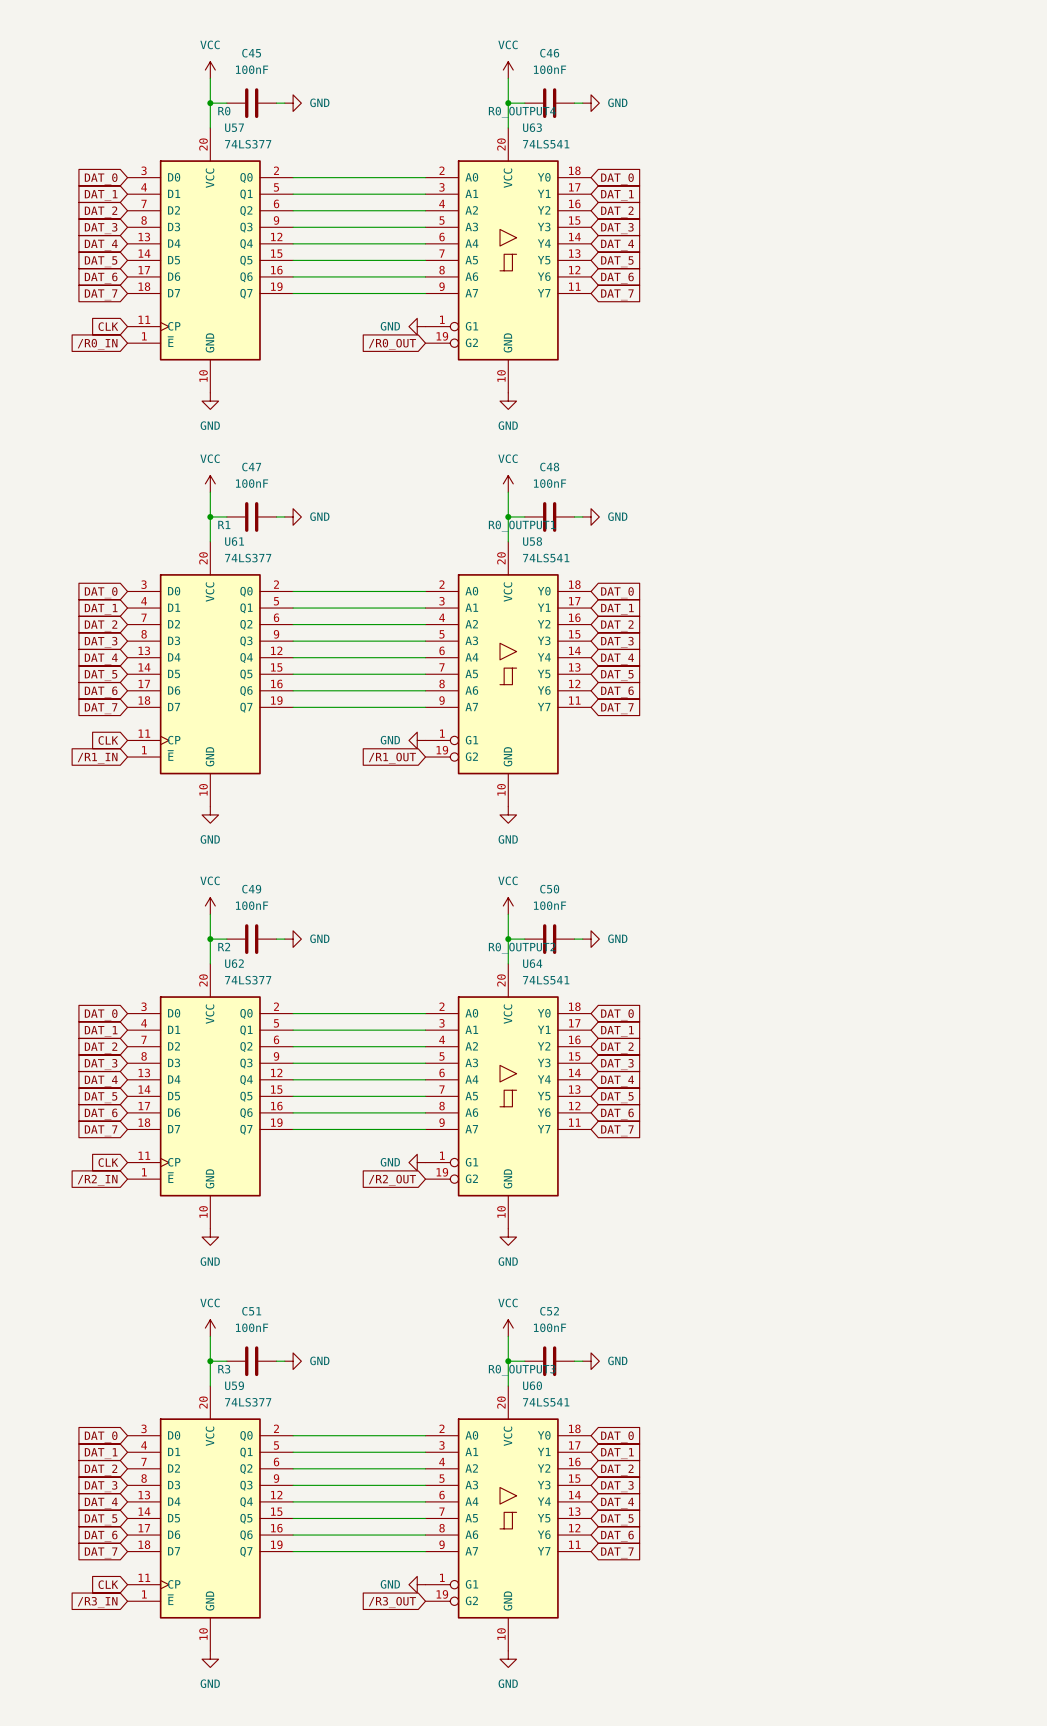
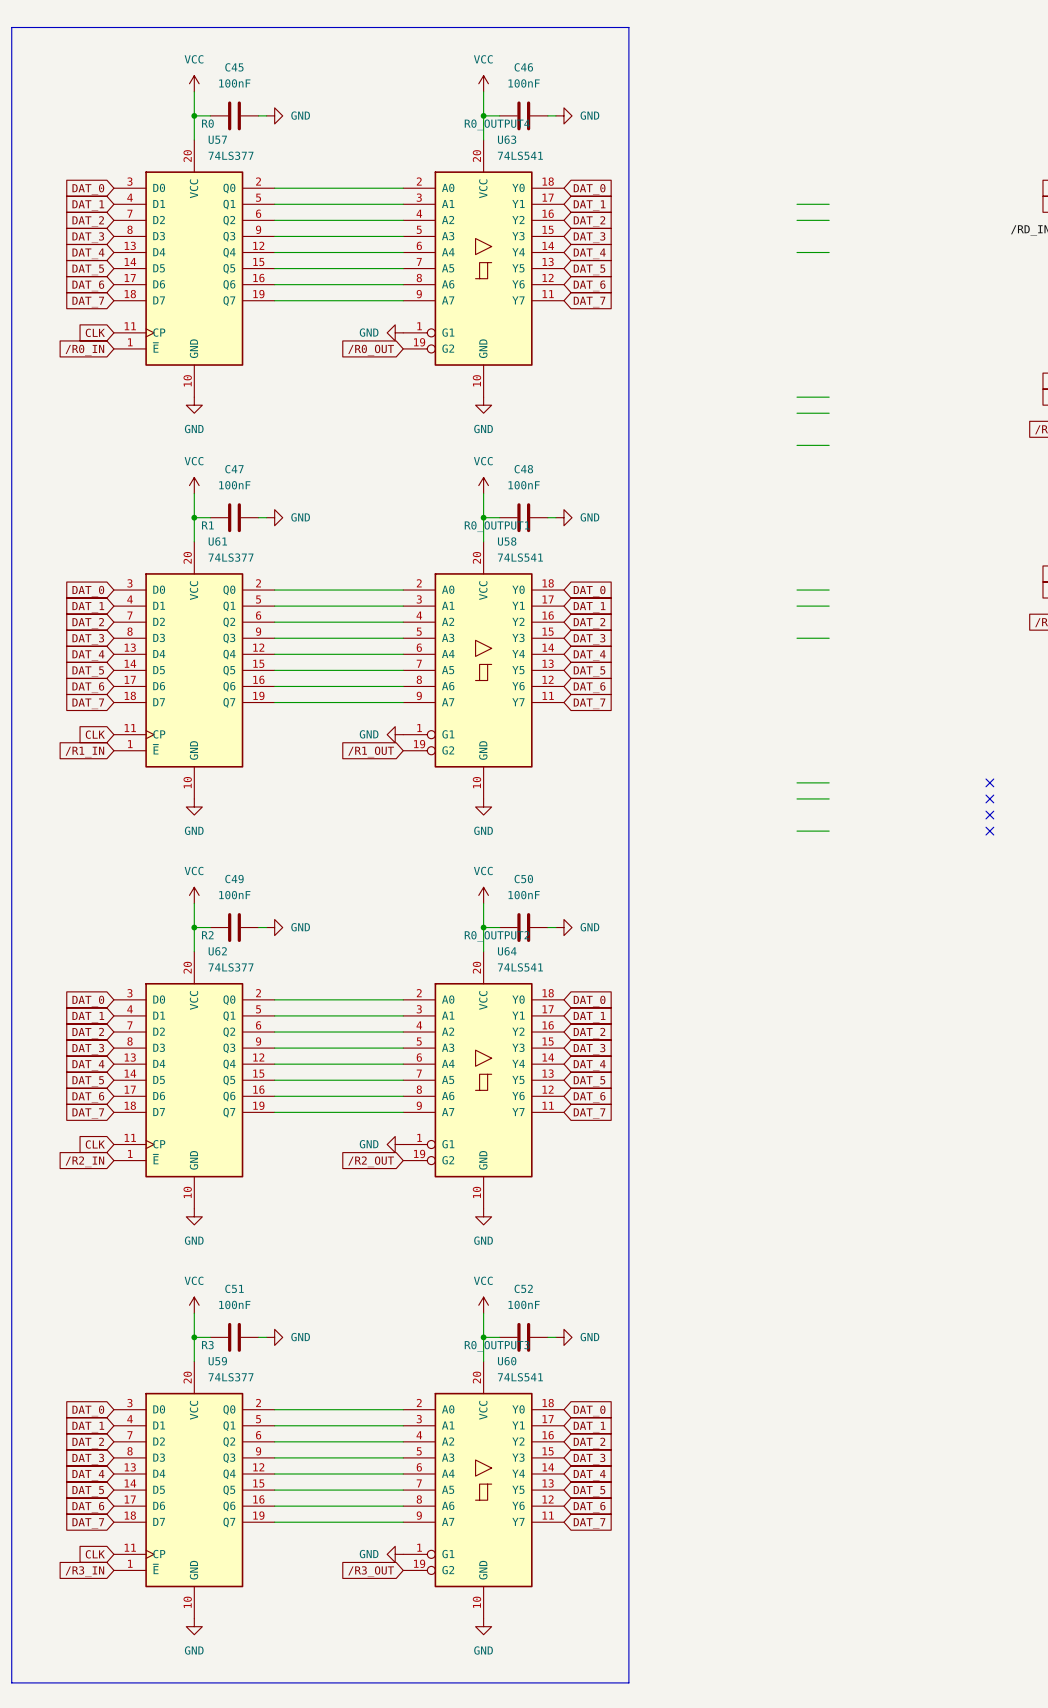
line: none -> (11, 27) (628, 27) (628, 1682) (11, 1682) (11, 27)
wire: none -> (797, 204) (829, 204)
wire: none -> (797, 220) (829, 220)
wire: none -> (797, 252) (829, 252)
wire: none -> (797, 397) (829, 397)
wire: none -> (797, 413) (829, 413)
wire: none -> (797, 445) (829, 445)
wire: none -> (797, 590) (829, 590)
wire: none -> (797, 606) (829, 606)
wire: none -> (797, 638) (829, 638)
wire: none -> (797, 782) (829, 782)
no-connect mark: none -> (989, 782)
wire: none -> (797, 798) (829, 798)
no-connect mark: none -> (989, 798)
no-connect mark: none -> (989, 815)
wire: none -> (797, 831) (829, 831)
no-connect mark: none -> (989, 831)

